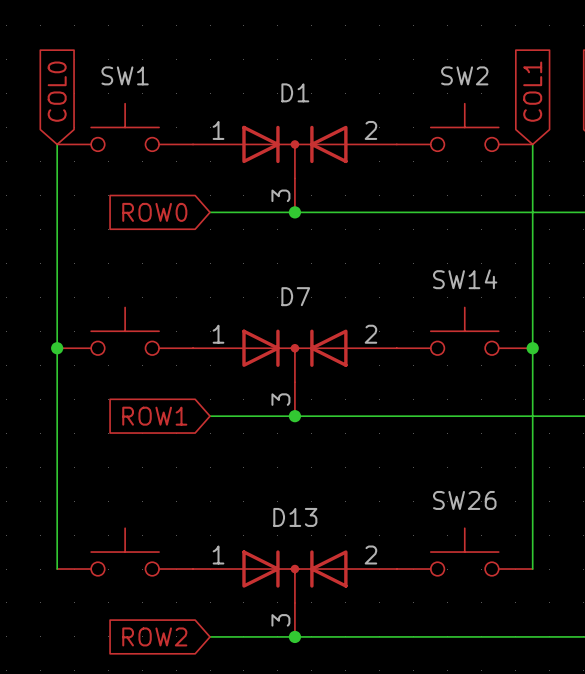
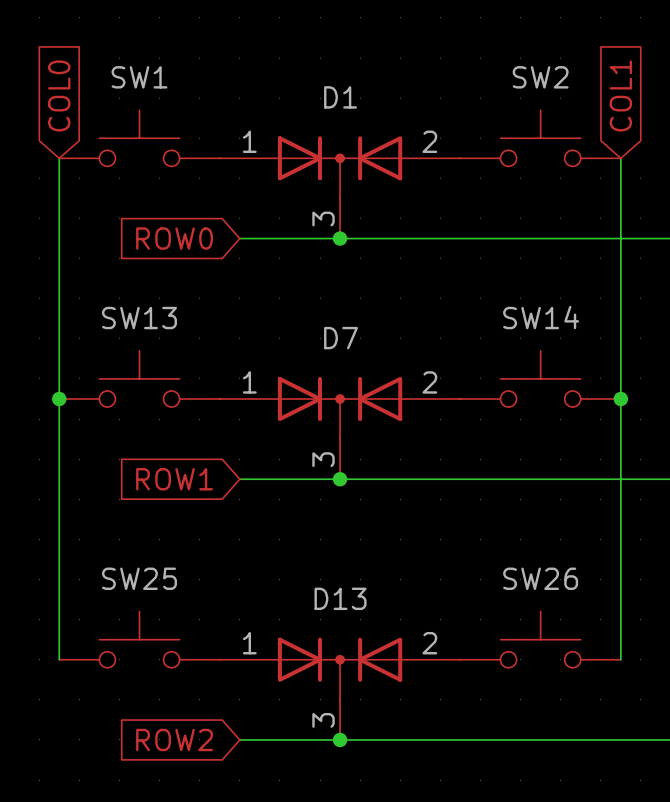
SW13 name: none -> SW13 (139, 318)
SW25 name: none -> SW25 (139, 578)

